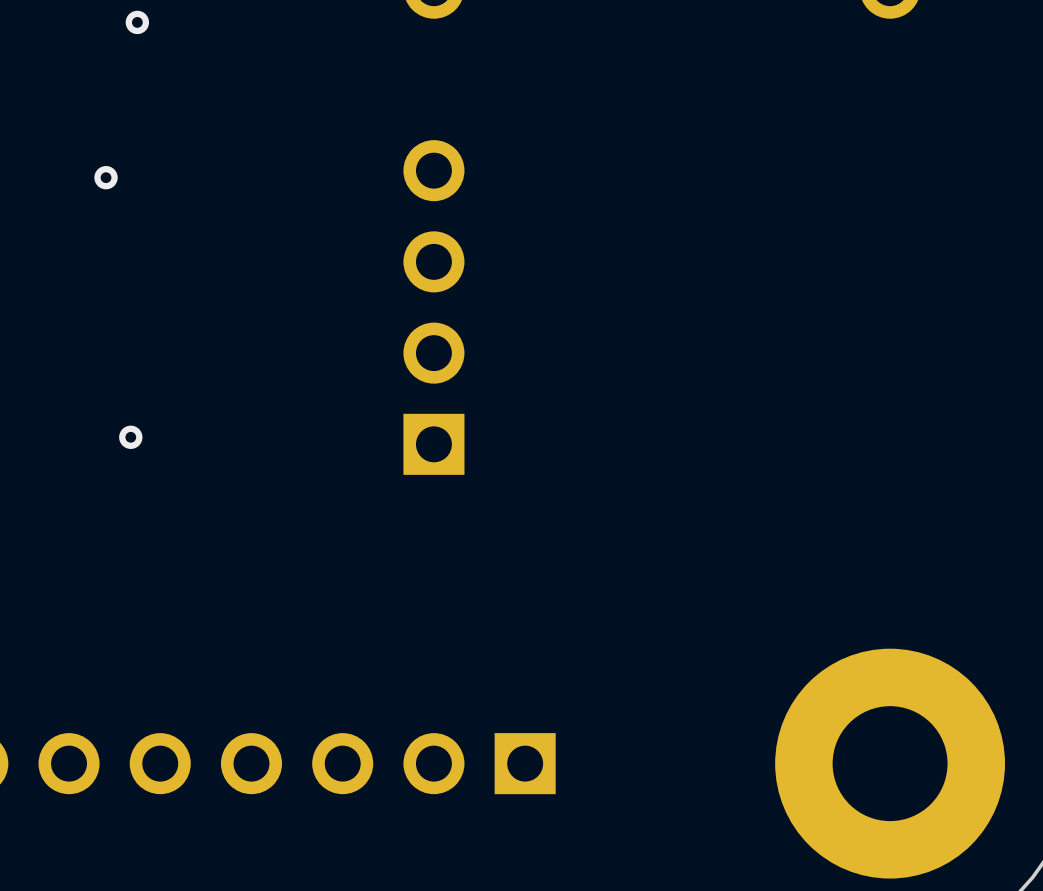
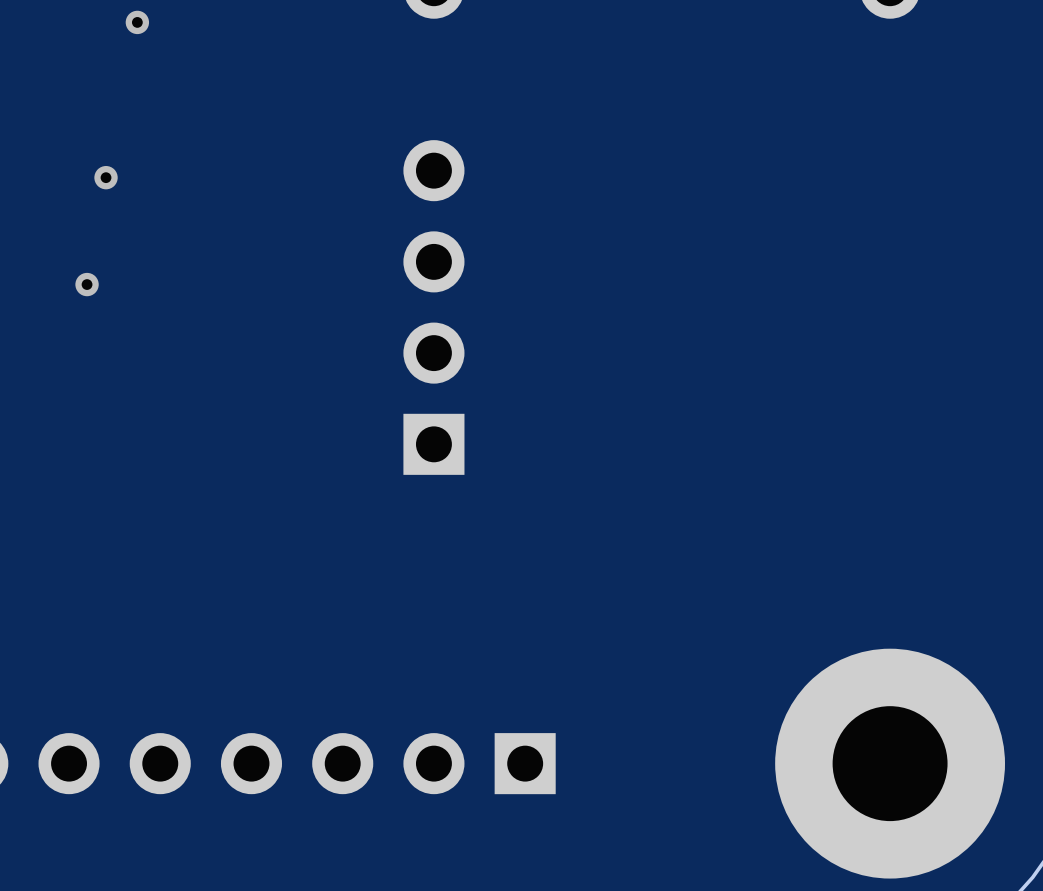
via position: (130, 437) -> (87, 284)

